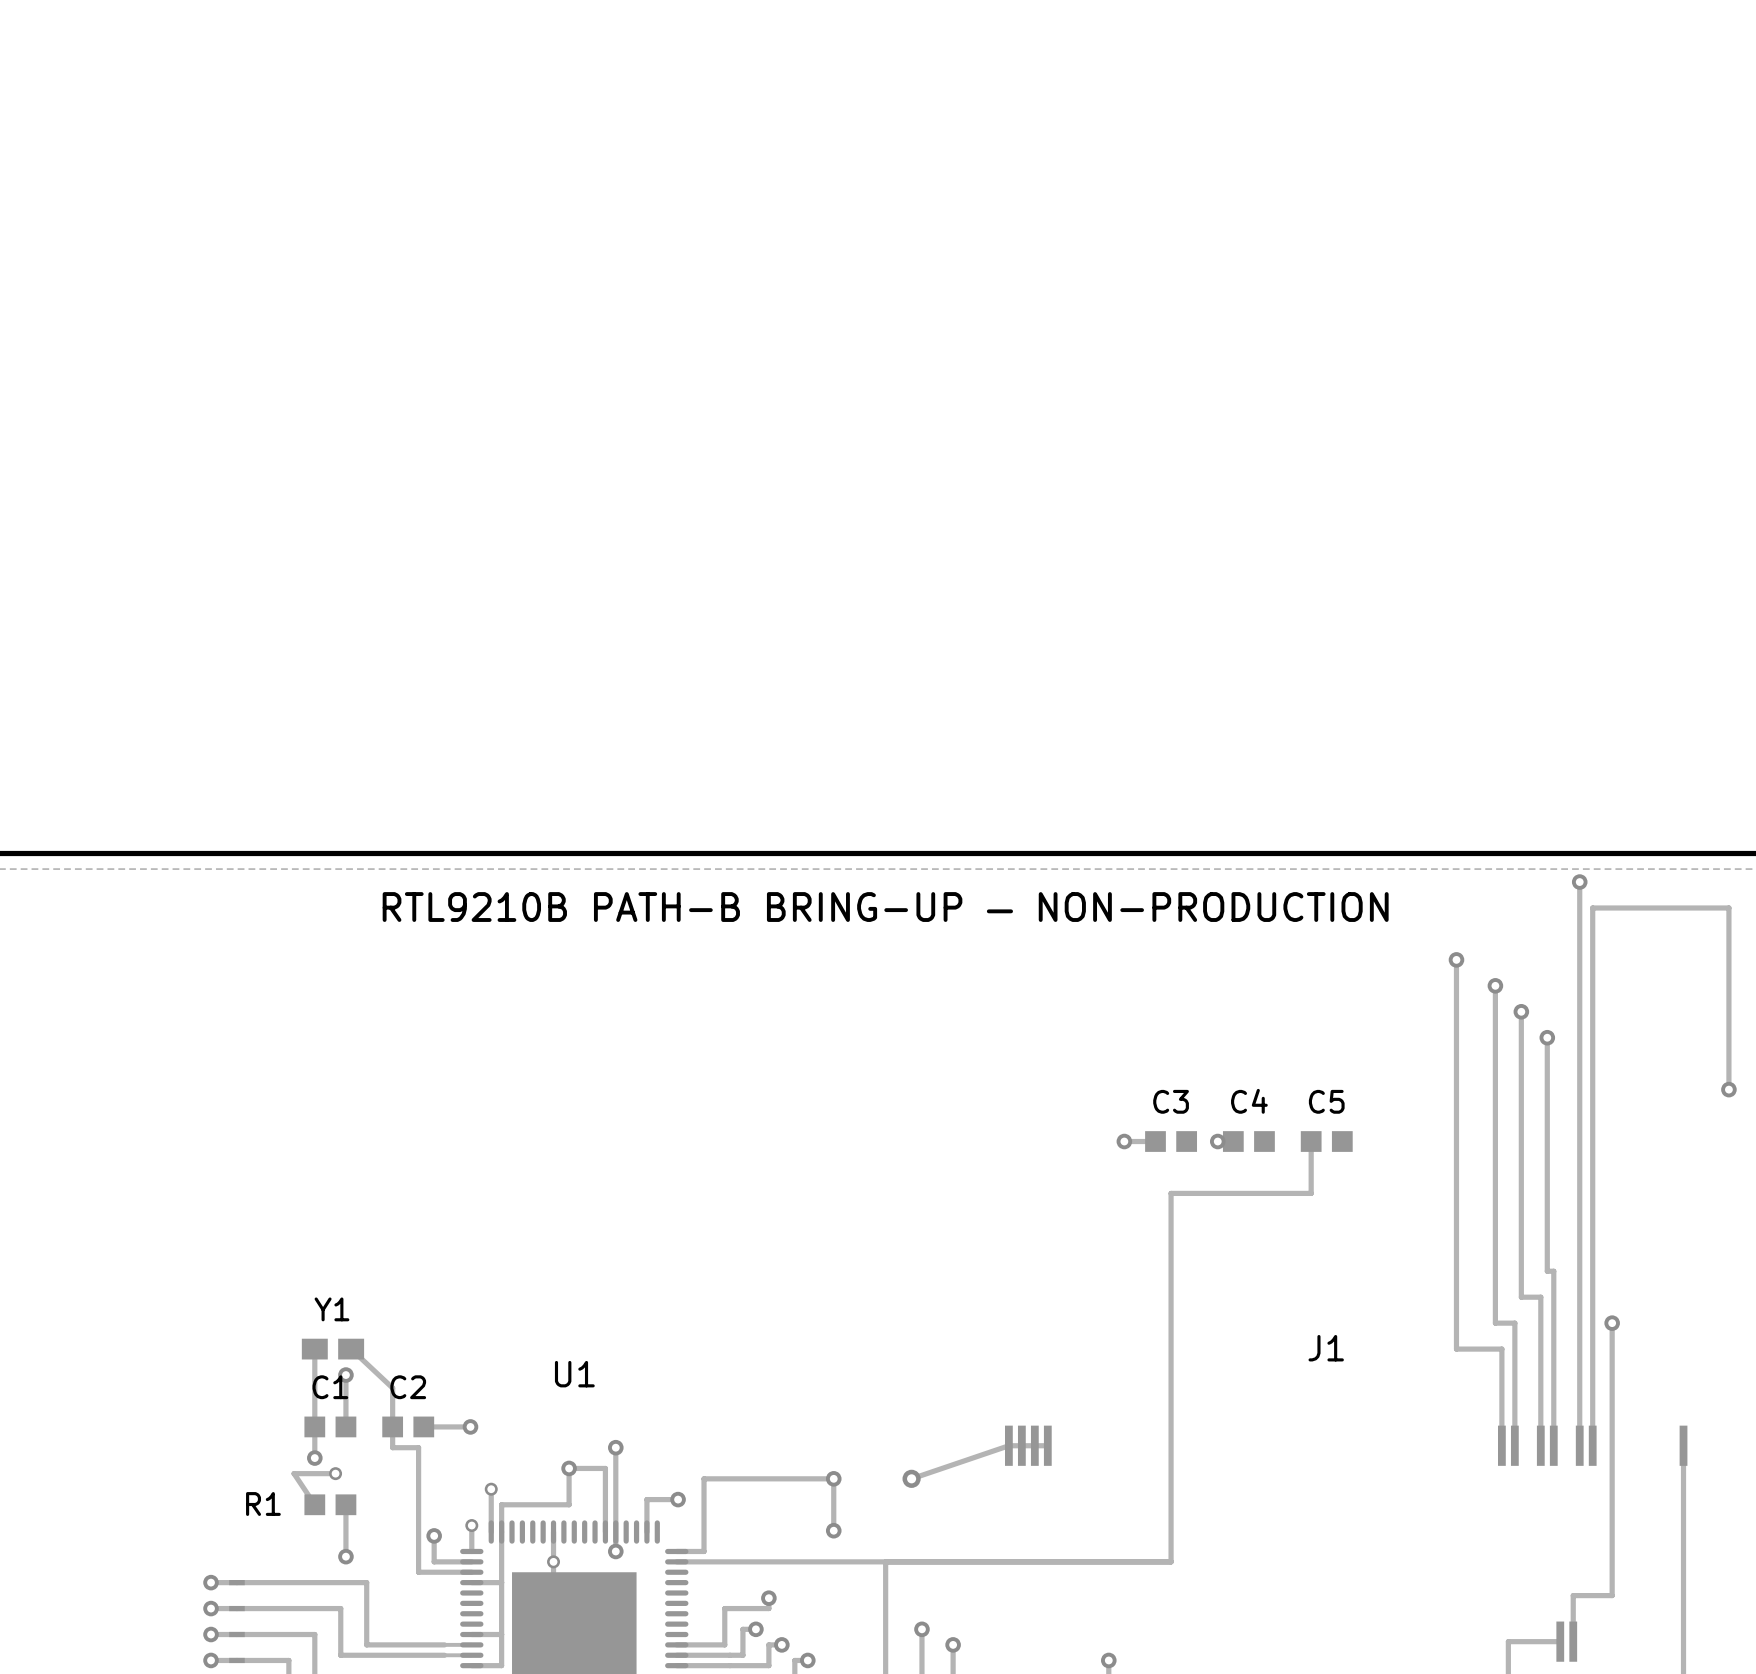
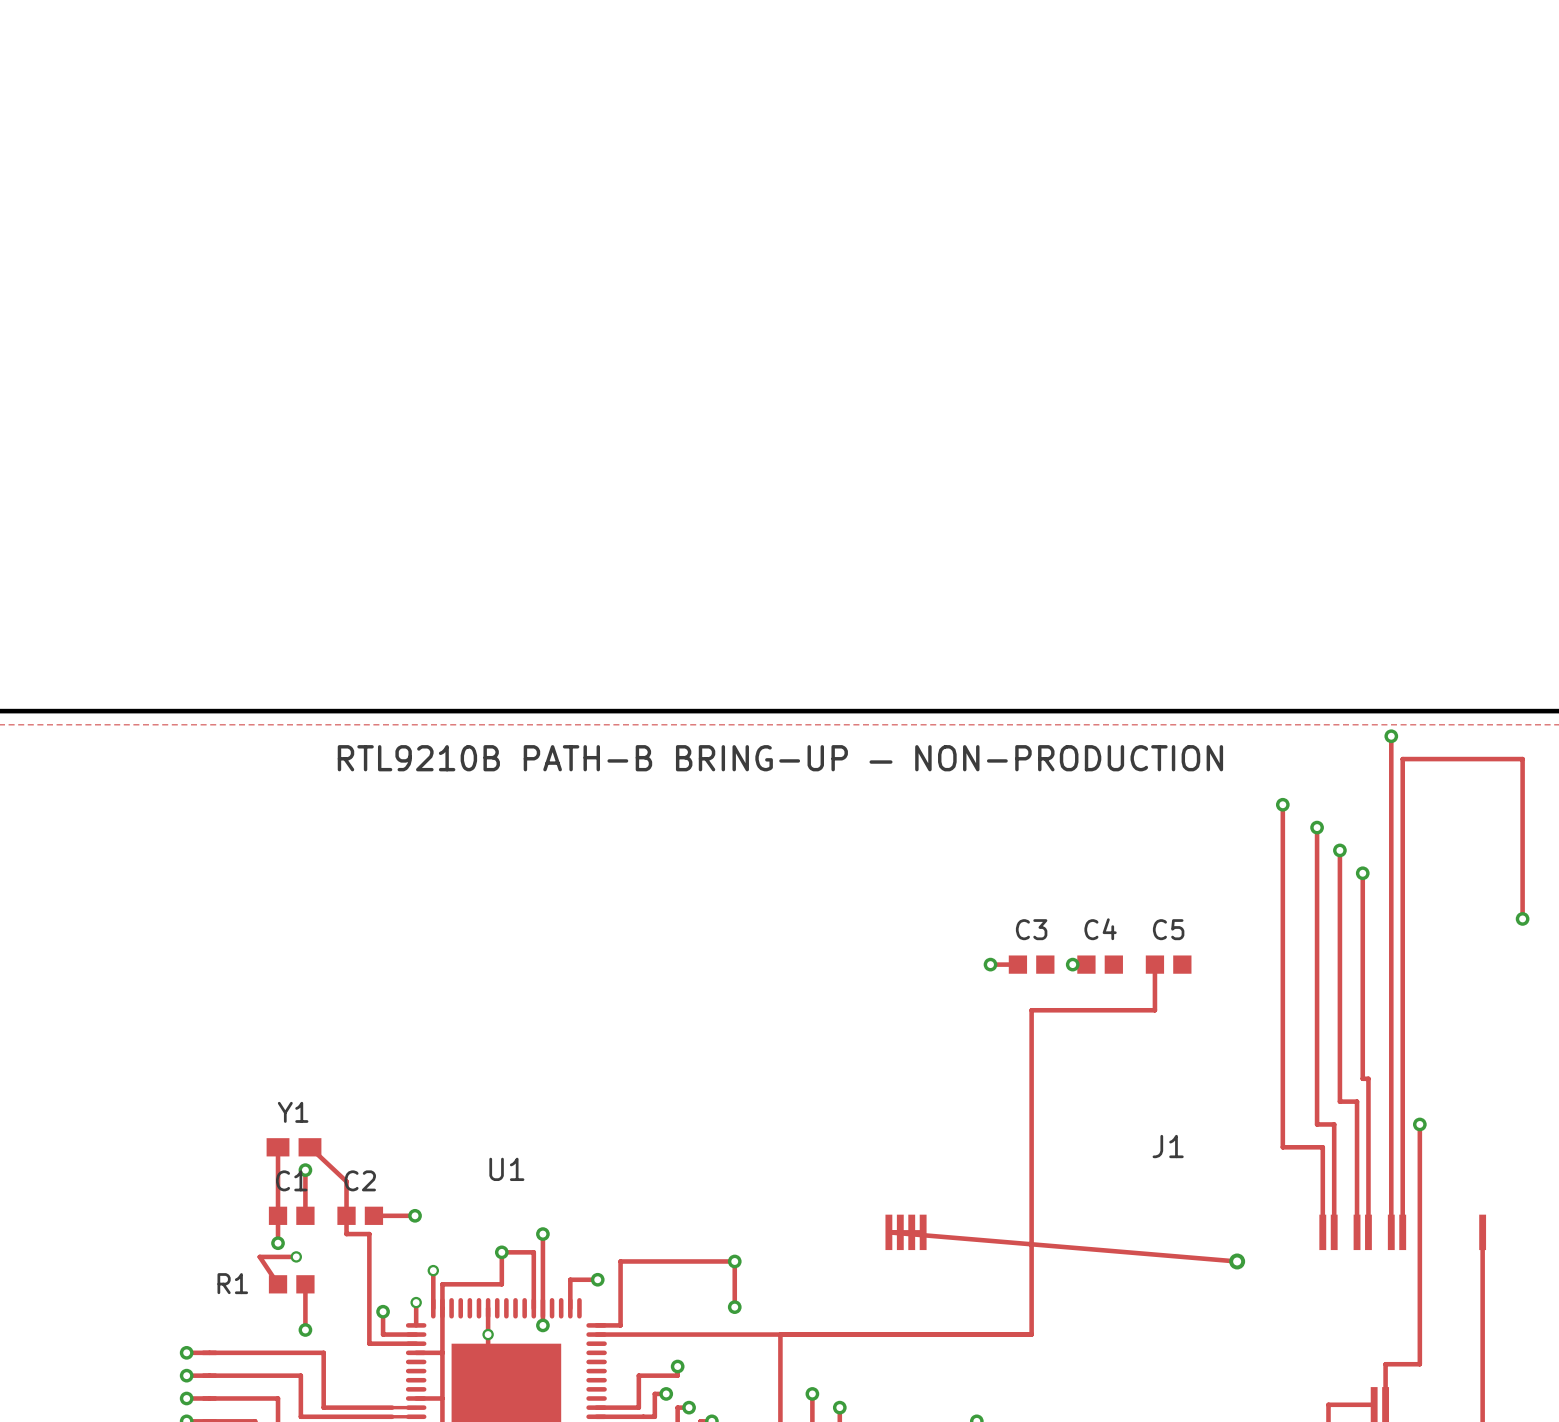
track: (1008, 1445) (911, 1478) -> (888, 1232) (1237, 1261)
via: (911, 1478) -> none
via: none -> (1237, 1261)

